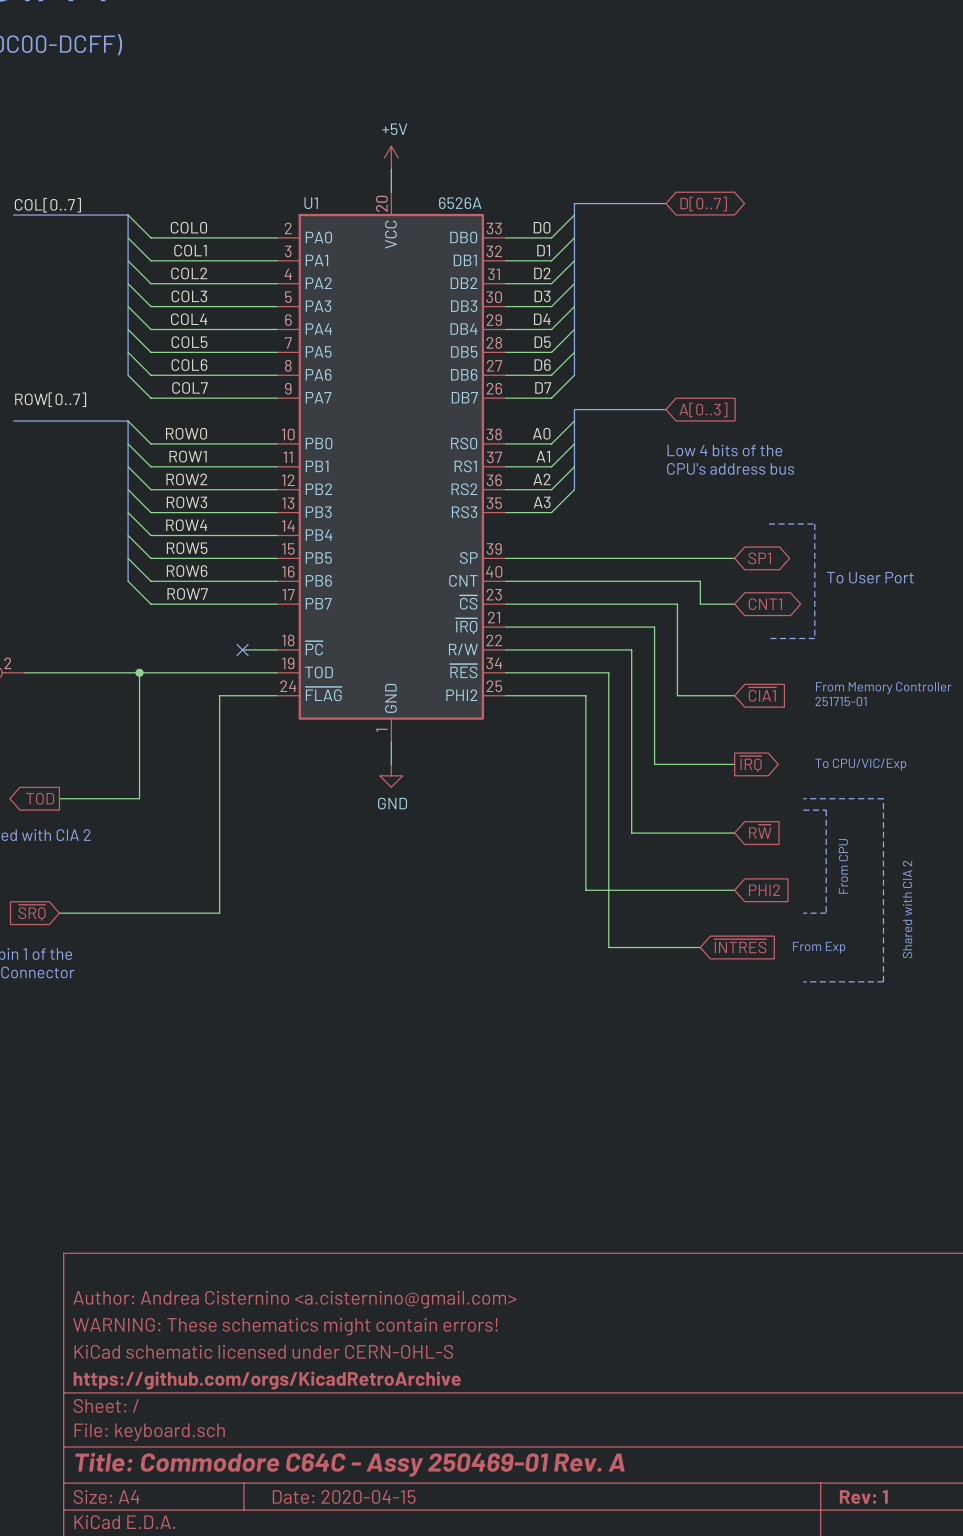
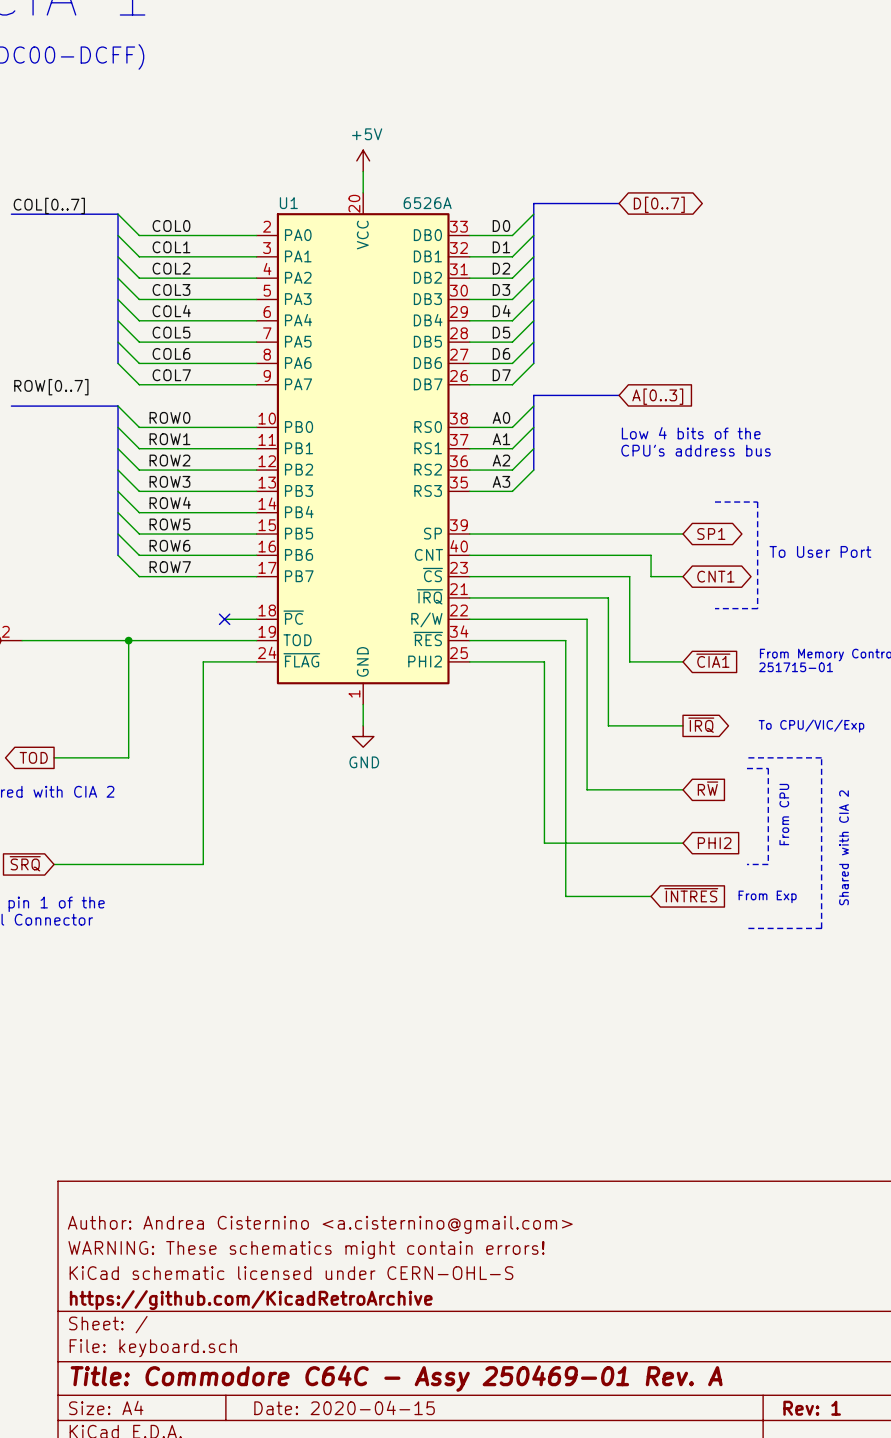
title block: https://github.com/orgs/KicadRetroArchive (267, 1380) -> https://github.com/KicadRetroArchive (251, 1300)

